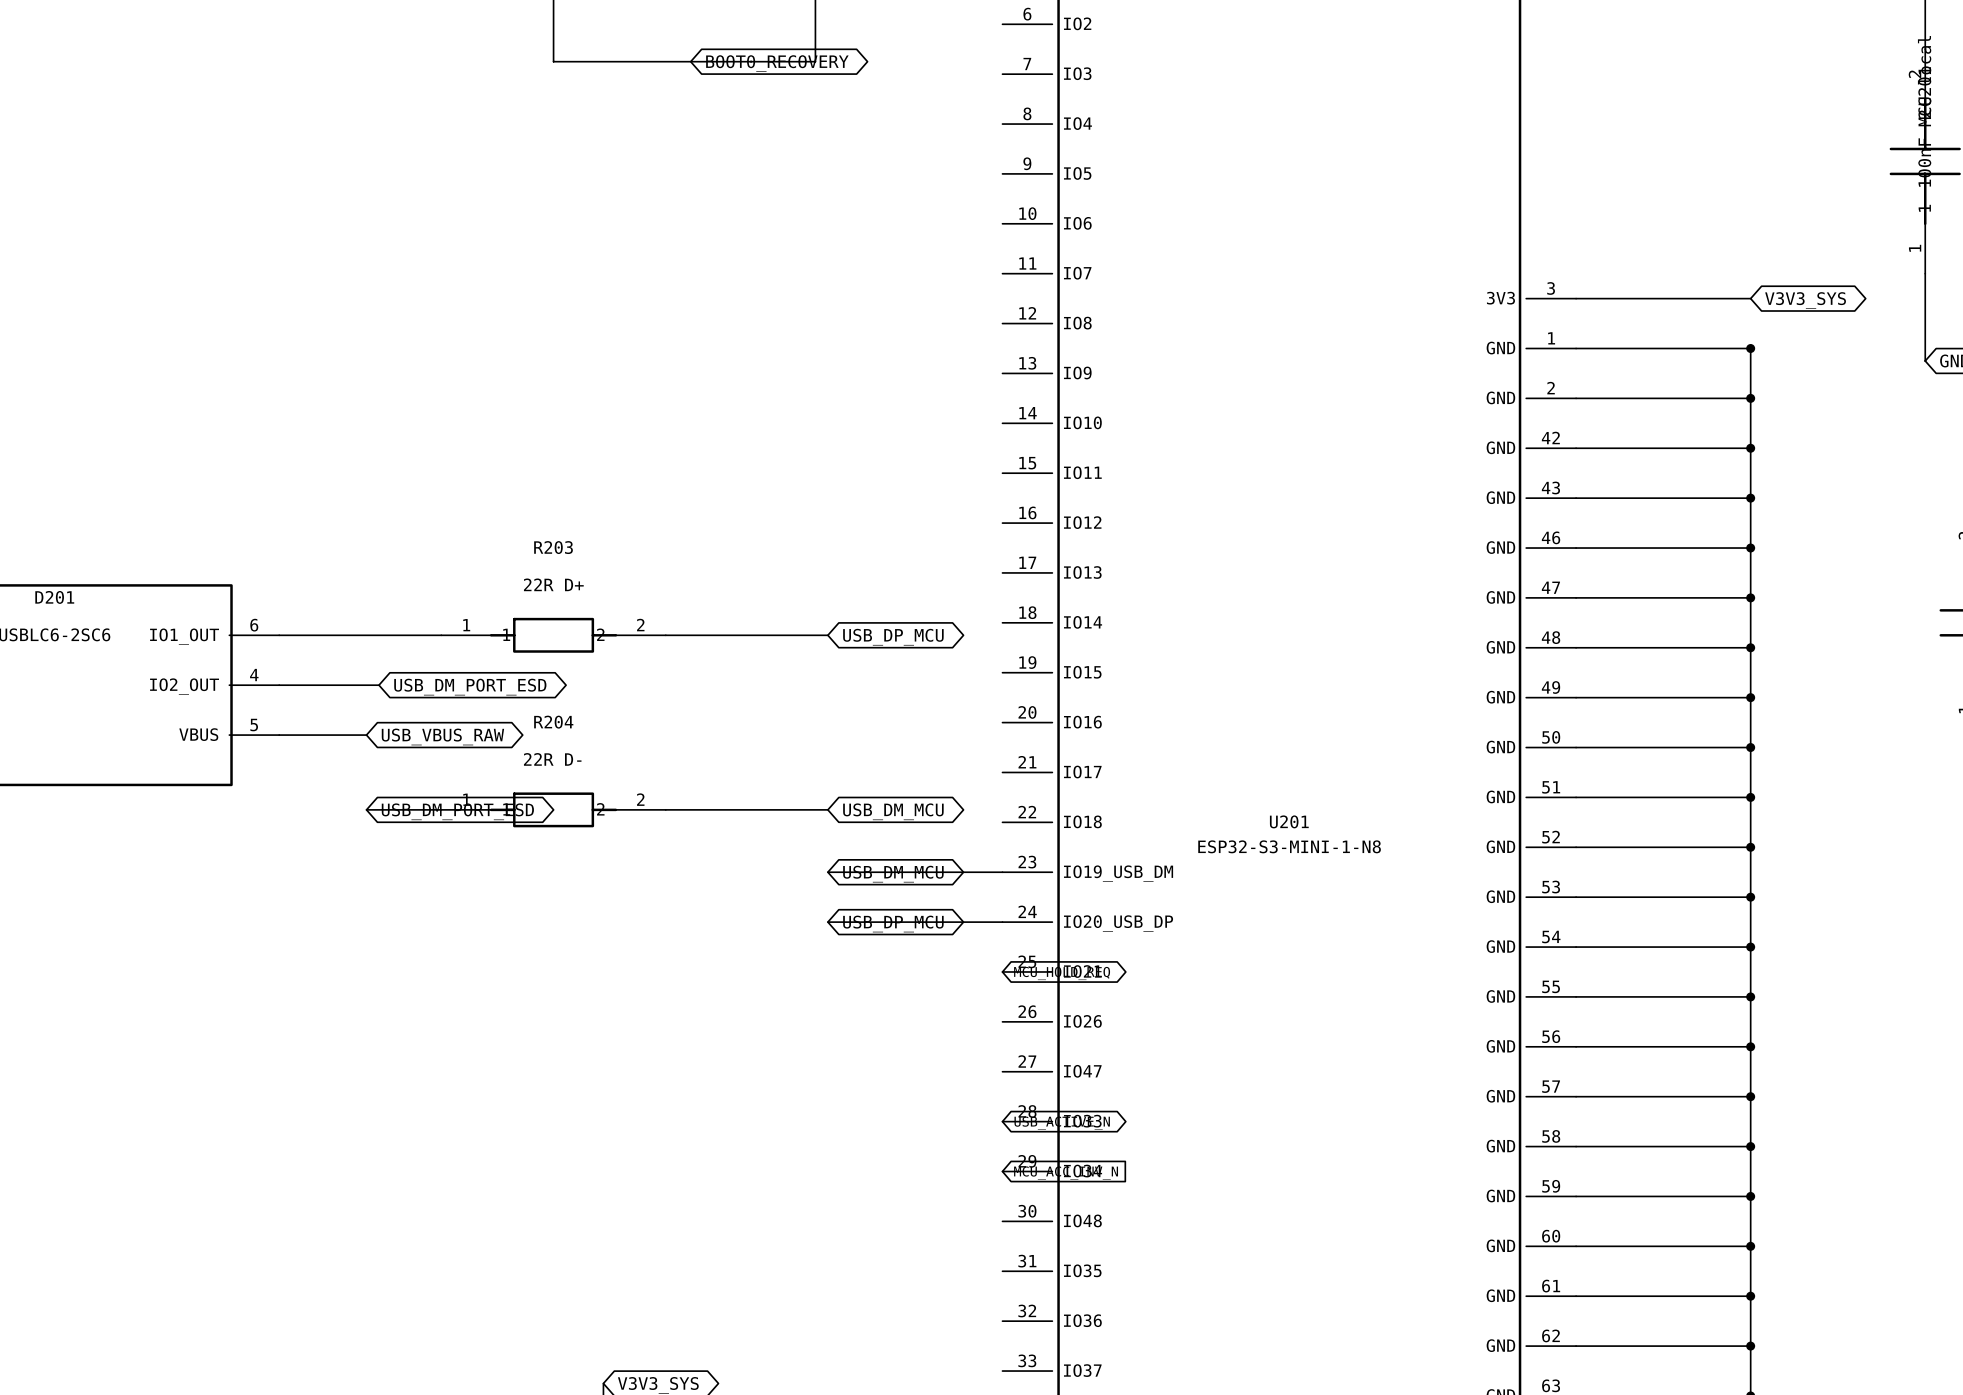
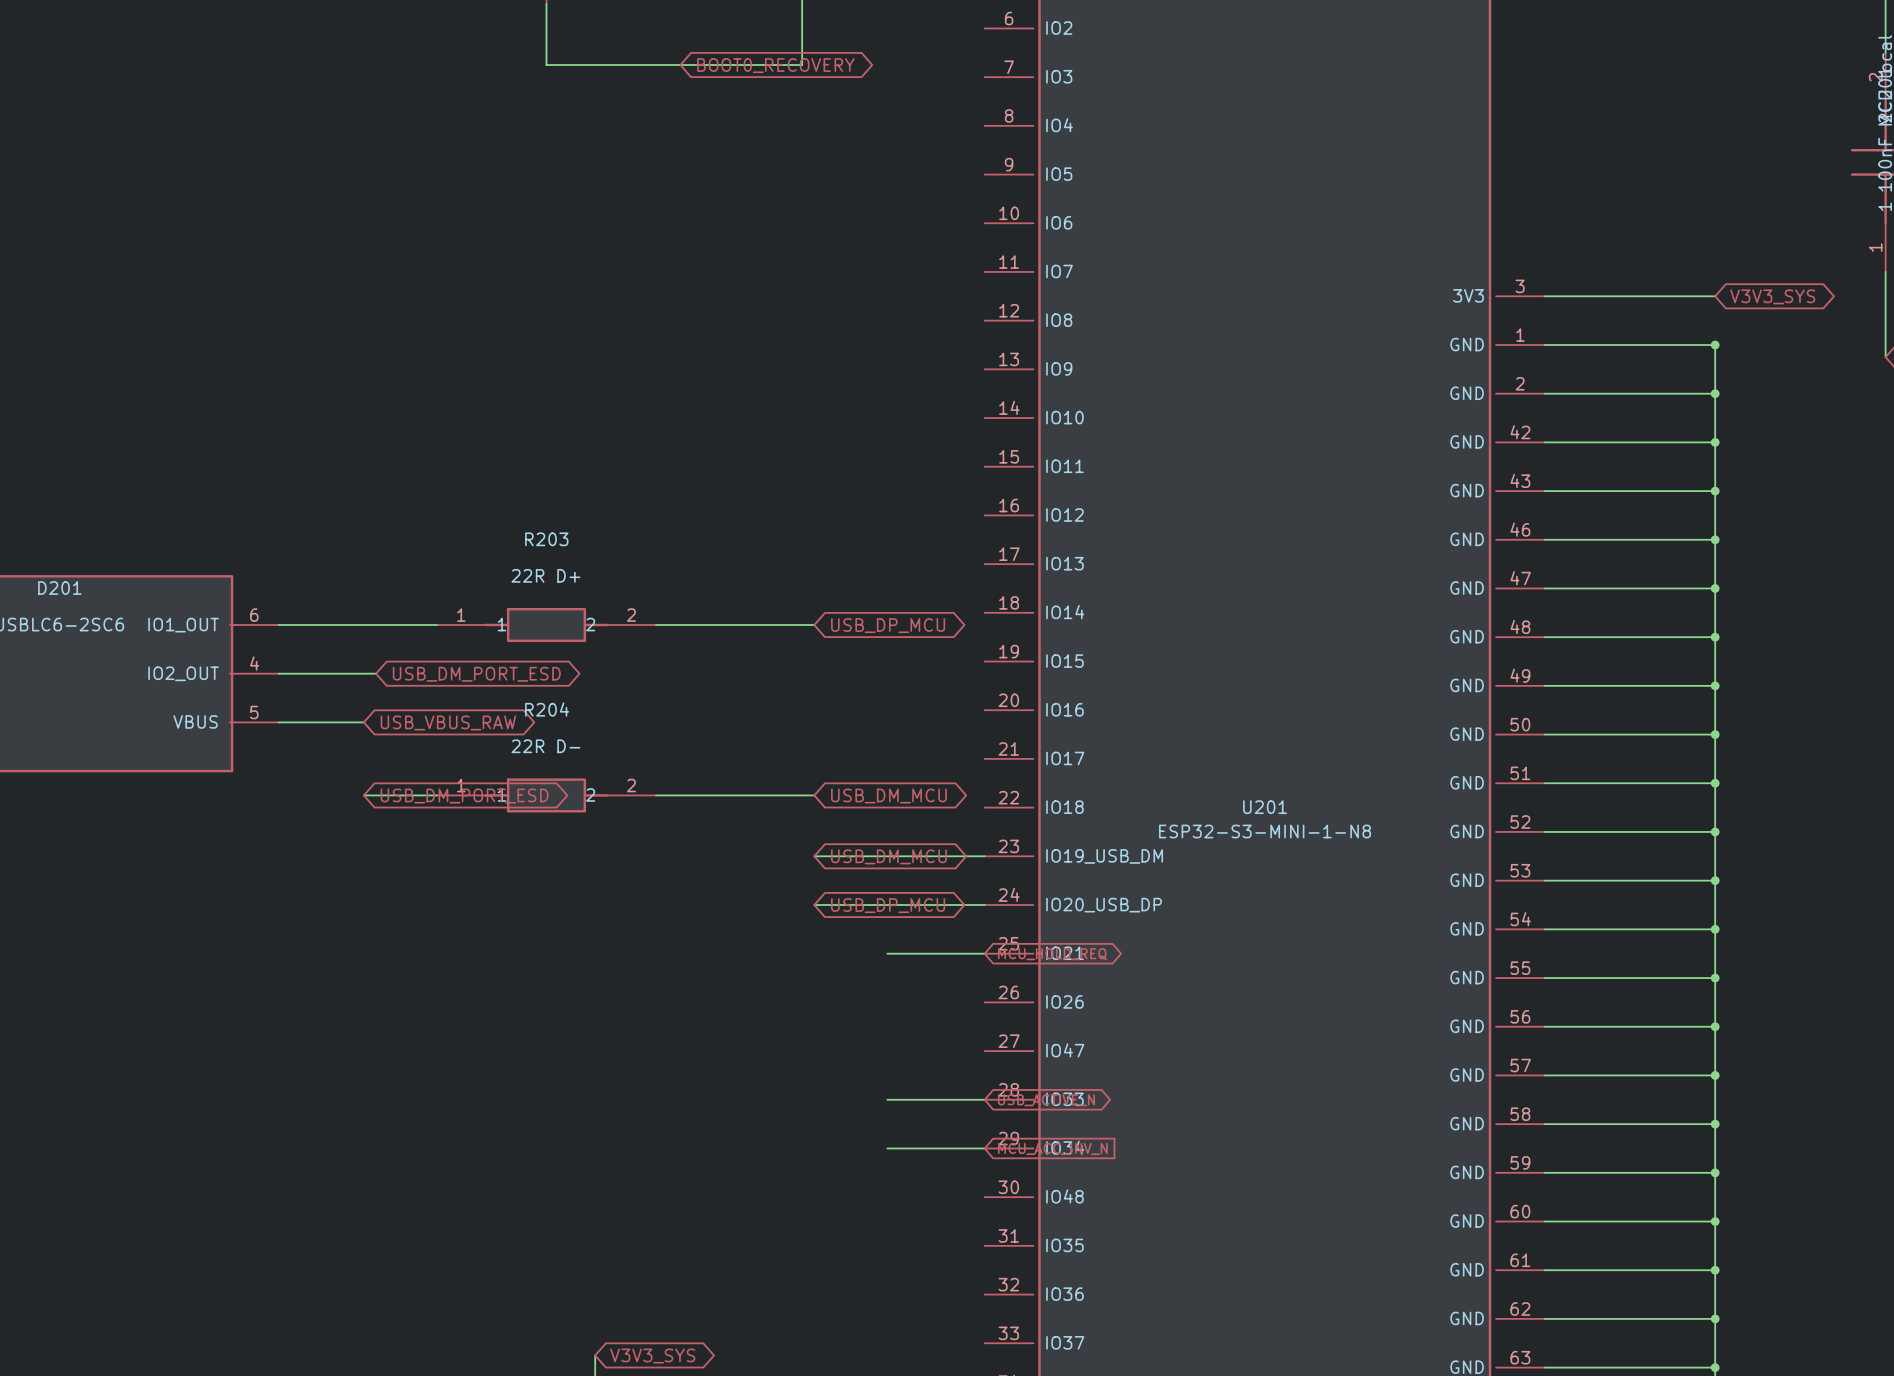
wire: none -> (887, 953) (984, 953)
wire: none -> (887, 1099) (984, 1099)
wire: none -> (887, 1148) (984, 1148)

